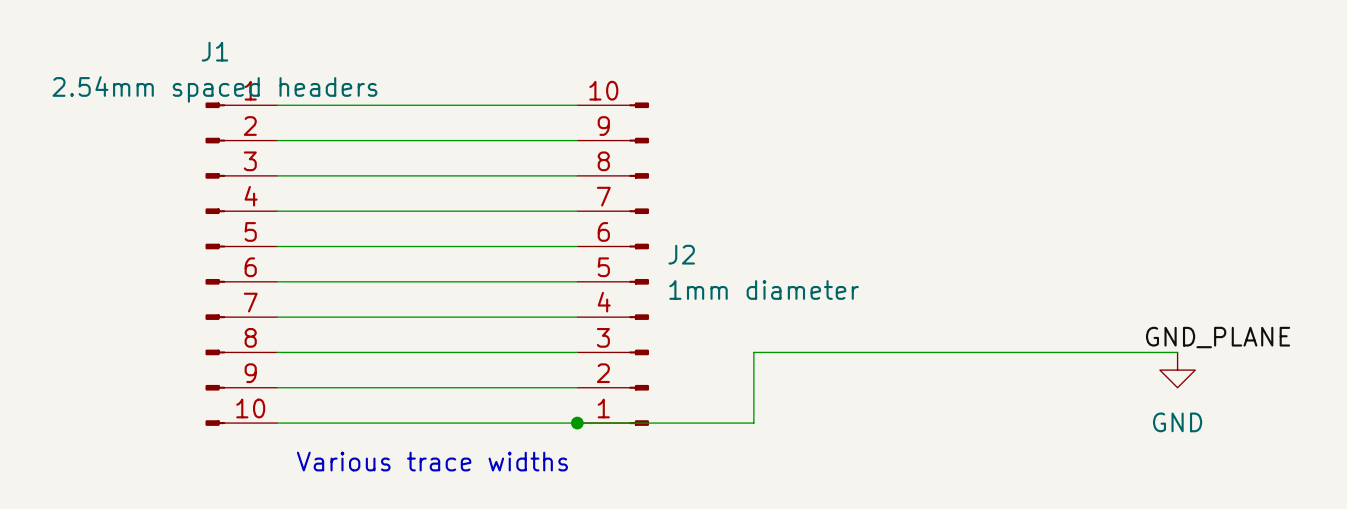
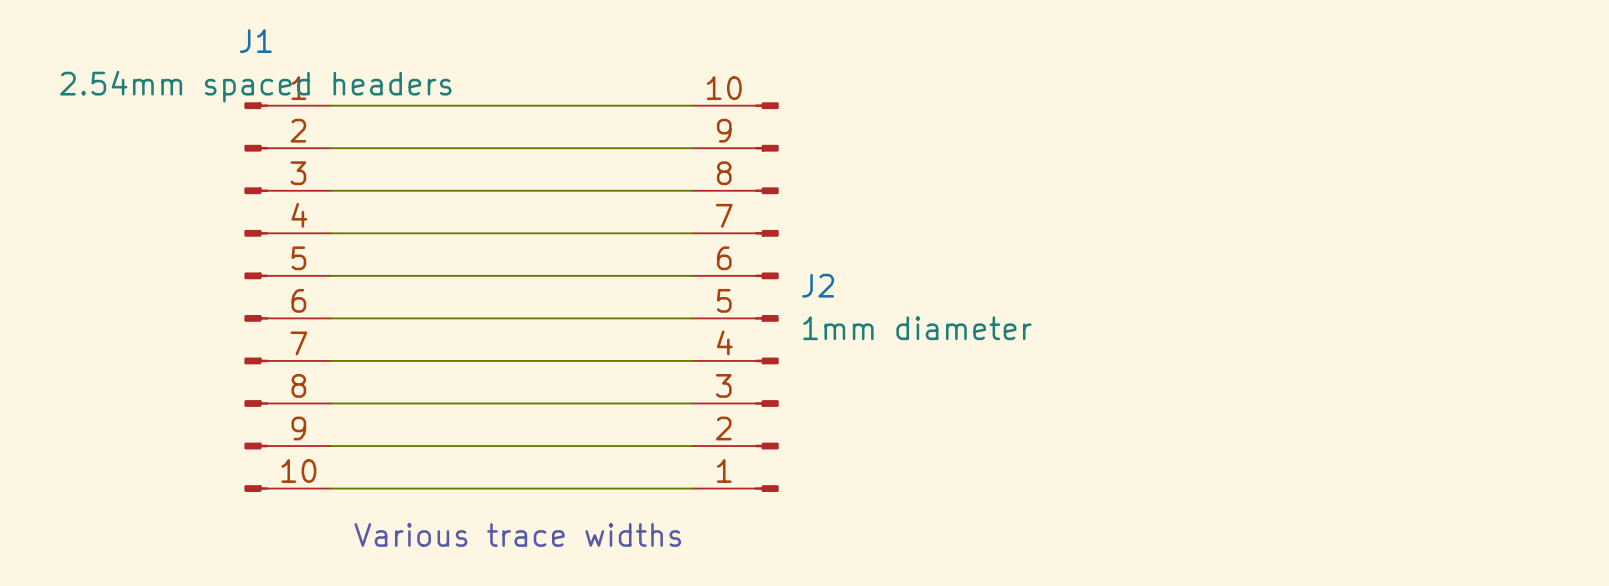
label: GND_PLANE (1218, 337) -> none
wire: (1177, 352) (753, 352) (753, 423) (577, 423) -> none
power symbol: GND (1177, 370) -> none
junction: (577, 423) -> none

